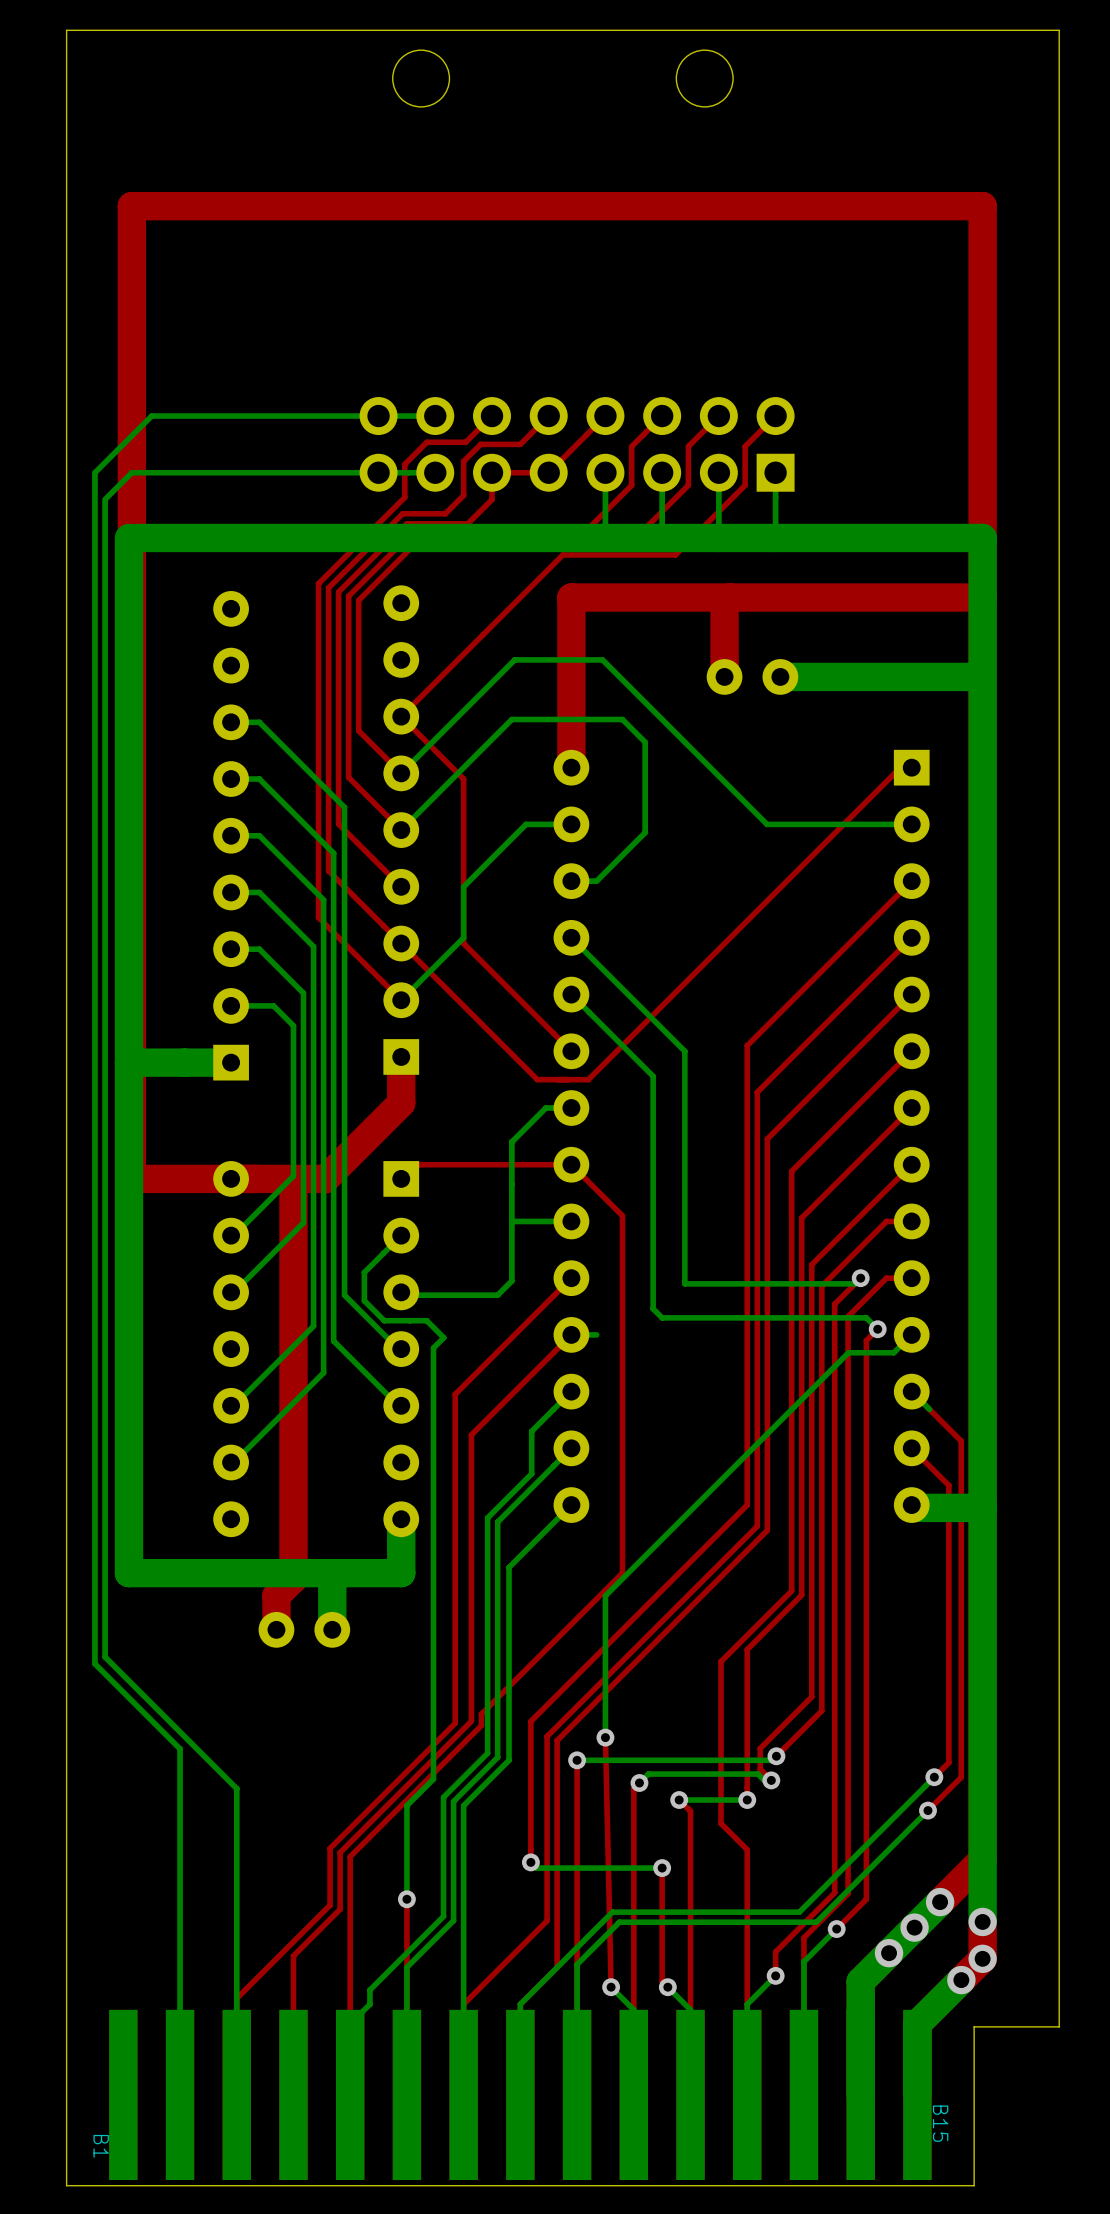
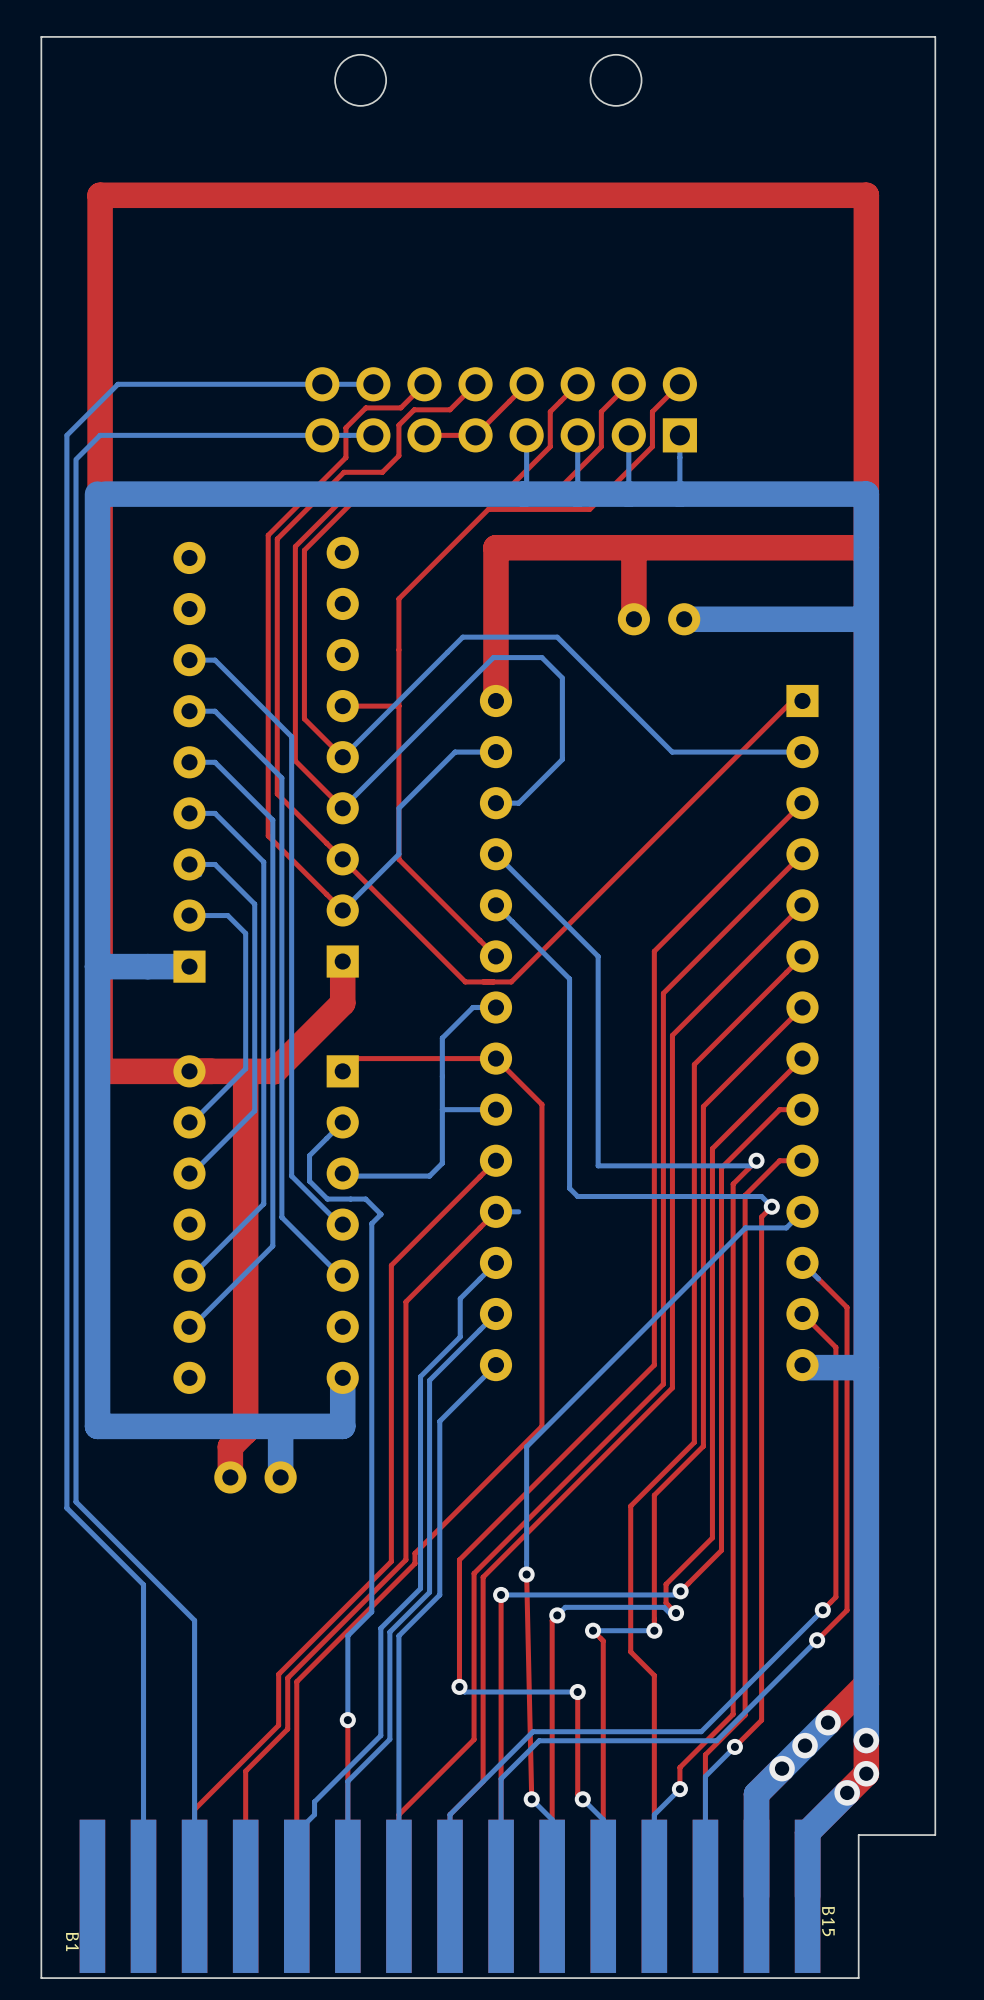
top track: (492, 472) (492, 499) (467, 523) (406, 523) (338, 592) (338, 824) (348, 834) -> none
top track: (463, 654) (401, 716) (463, 779) -> (398, 598) (398, 711)
bottom track: (639, 696) (602, 659) (514, 659) (401, 773) -> none
bottom track: (568, 719) (511, 719) -> (557, 637) (462, 637) (442, 657)
bottom track: none -> (493, 657) (342, 808)
top track: (358, 730) (401, 773) -> (304, 667) (304, 718)
top track: none -> (398, 706) (342, 706)
top track: (348, 777) (358, 787) -> (295, 709) (295, 760)

